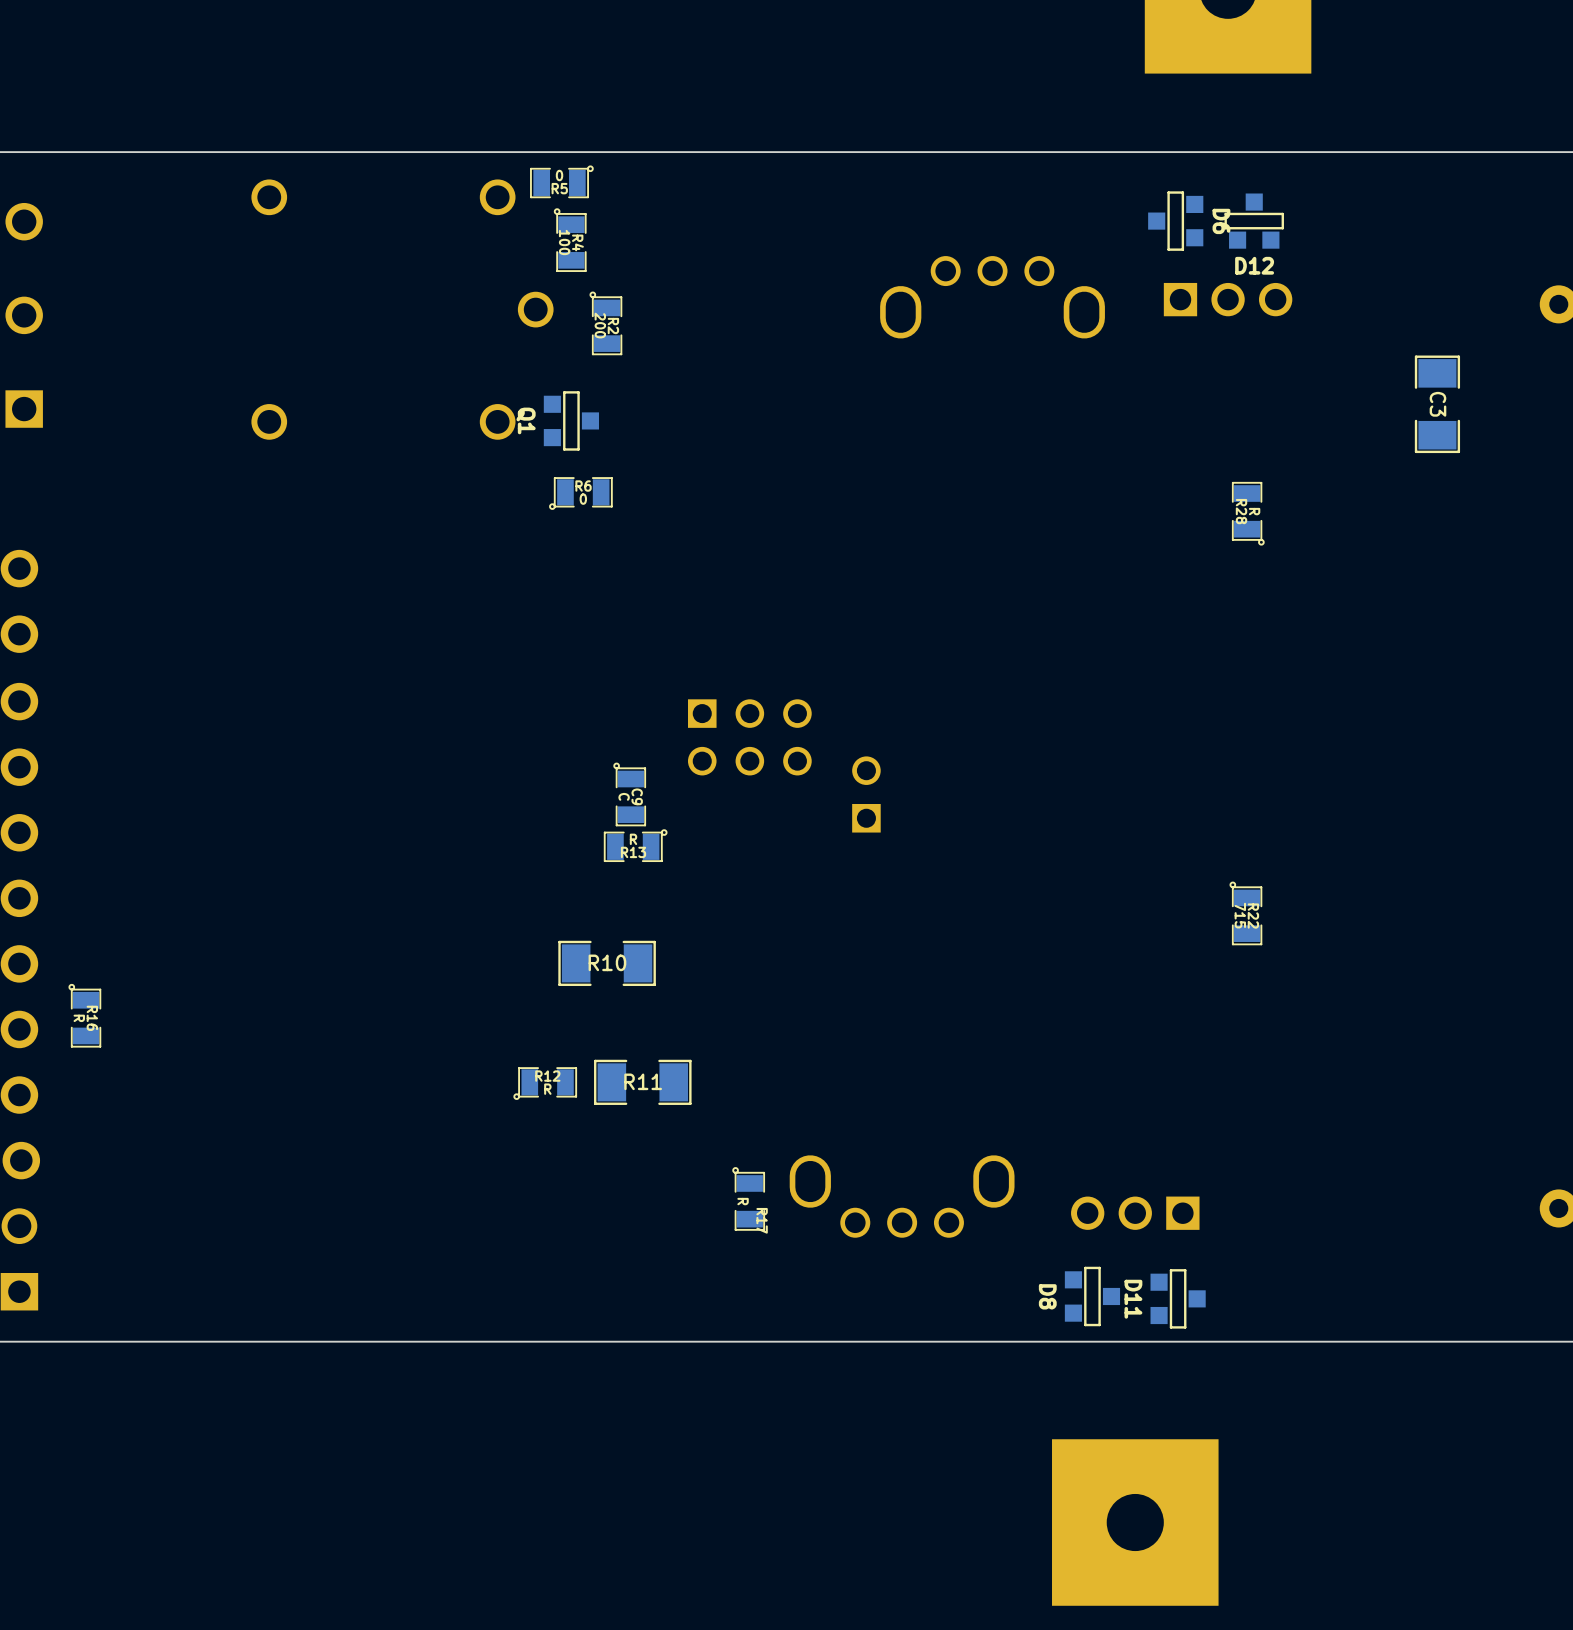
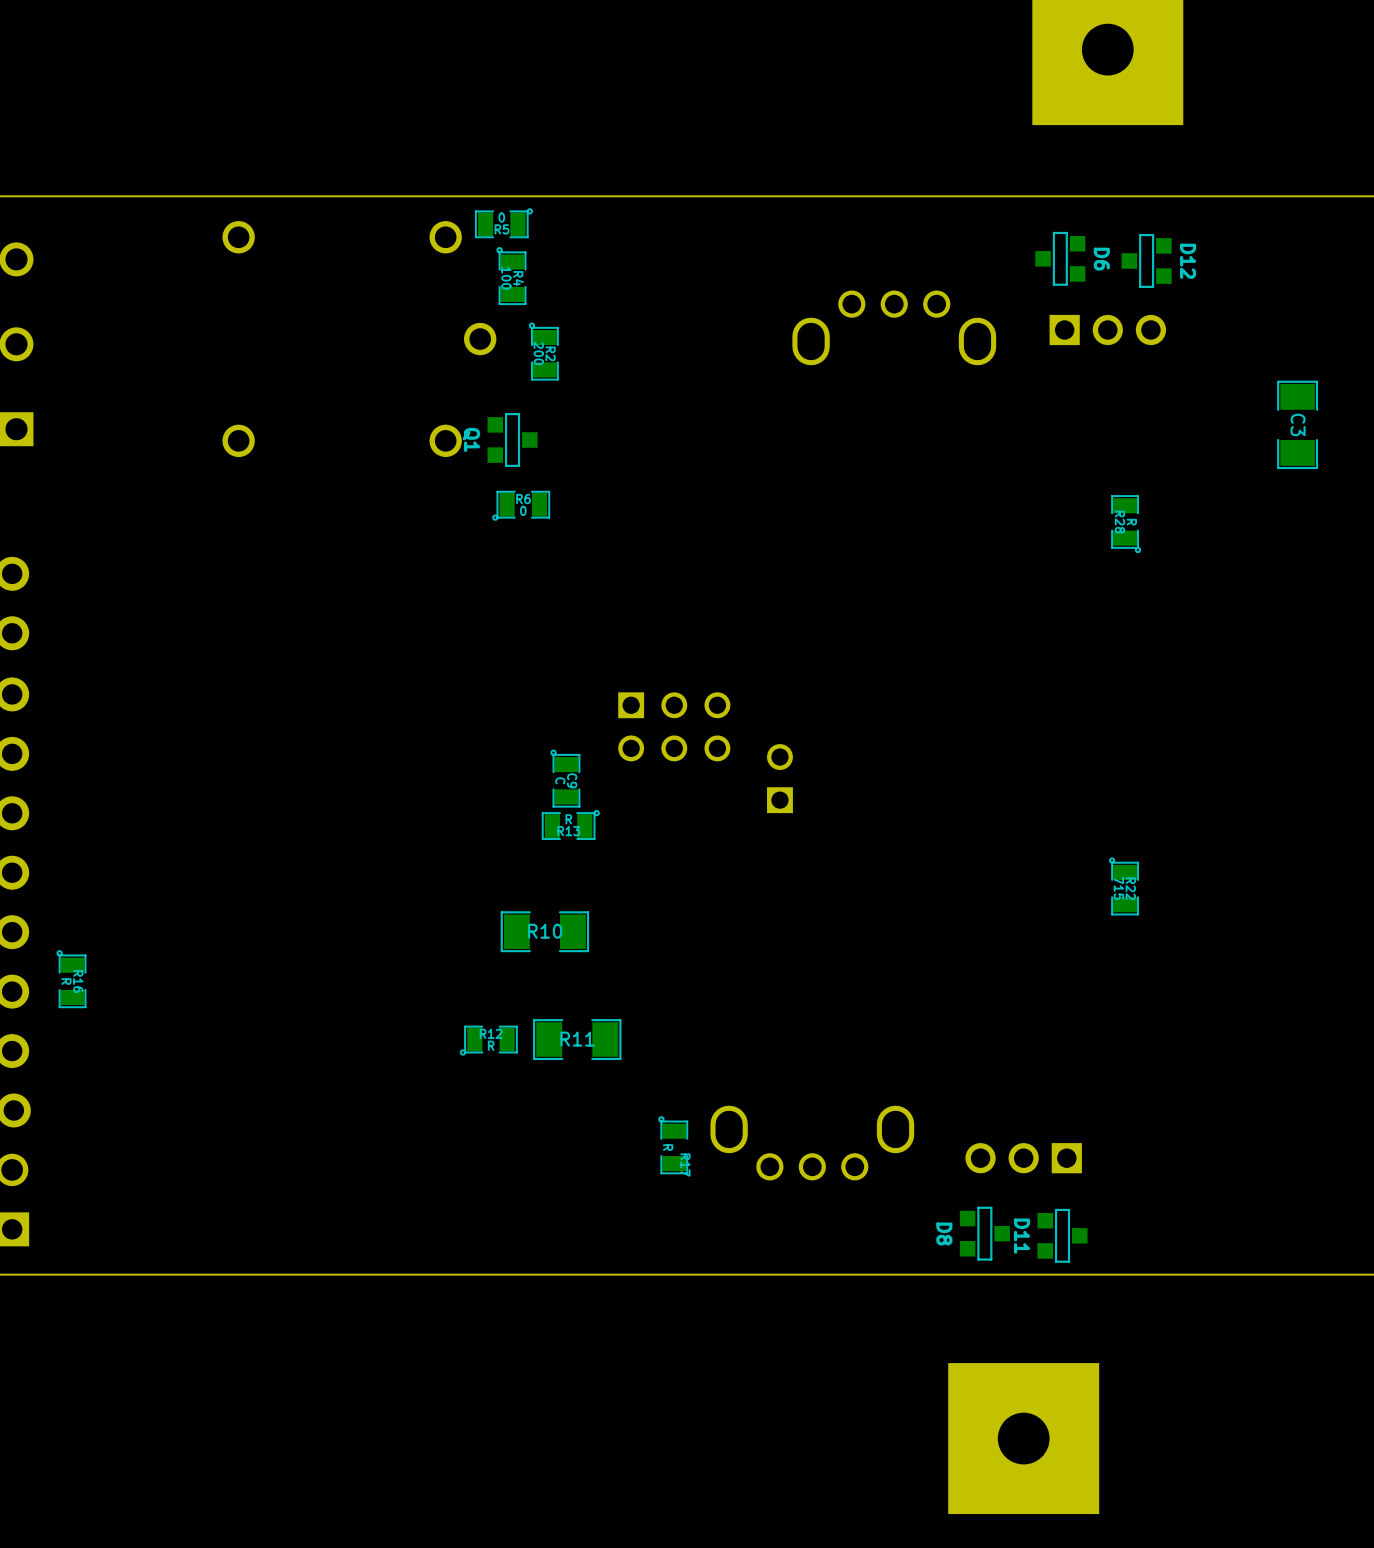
D12 rotation: 0° (1254, 221) -> 90° counterclockwise (1146, 260)

